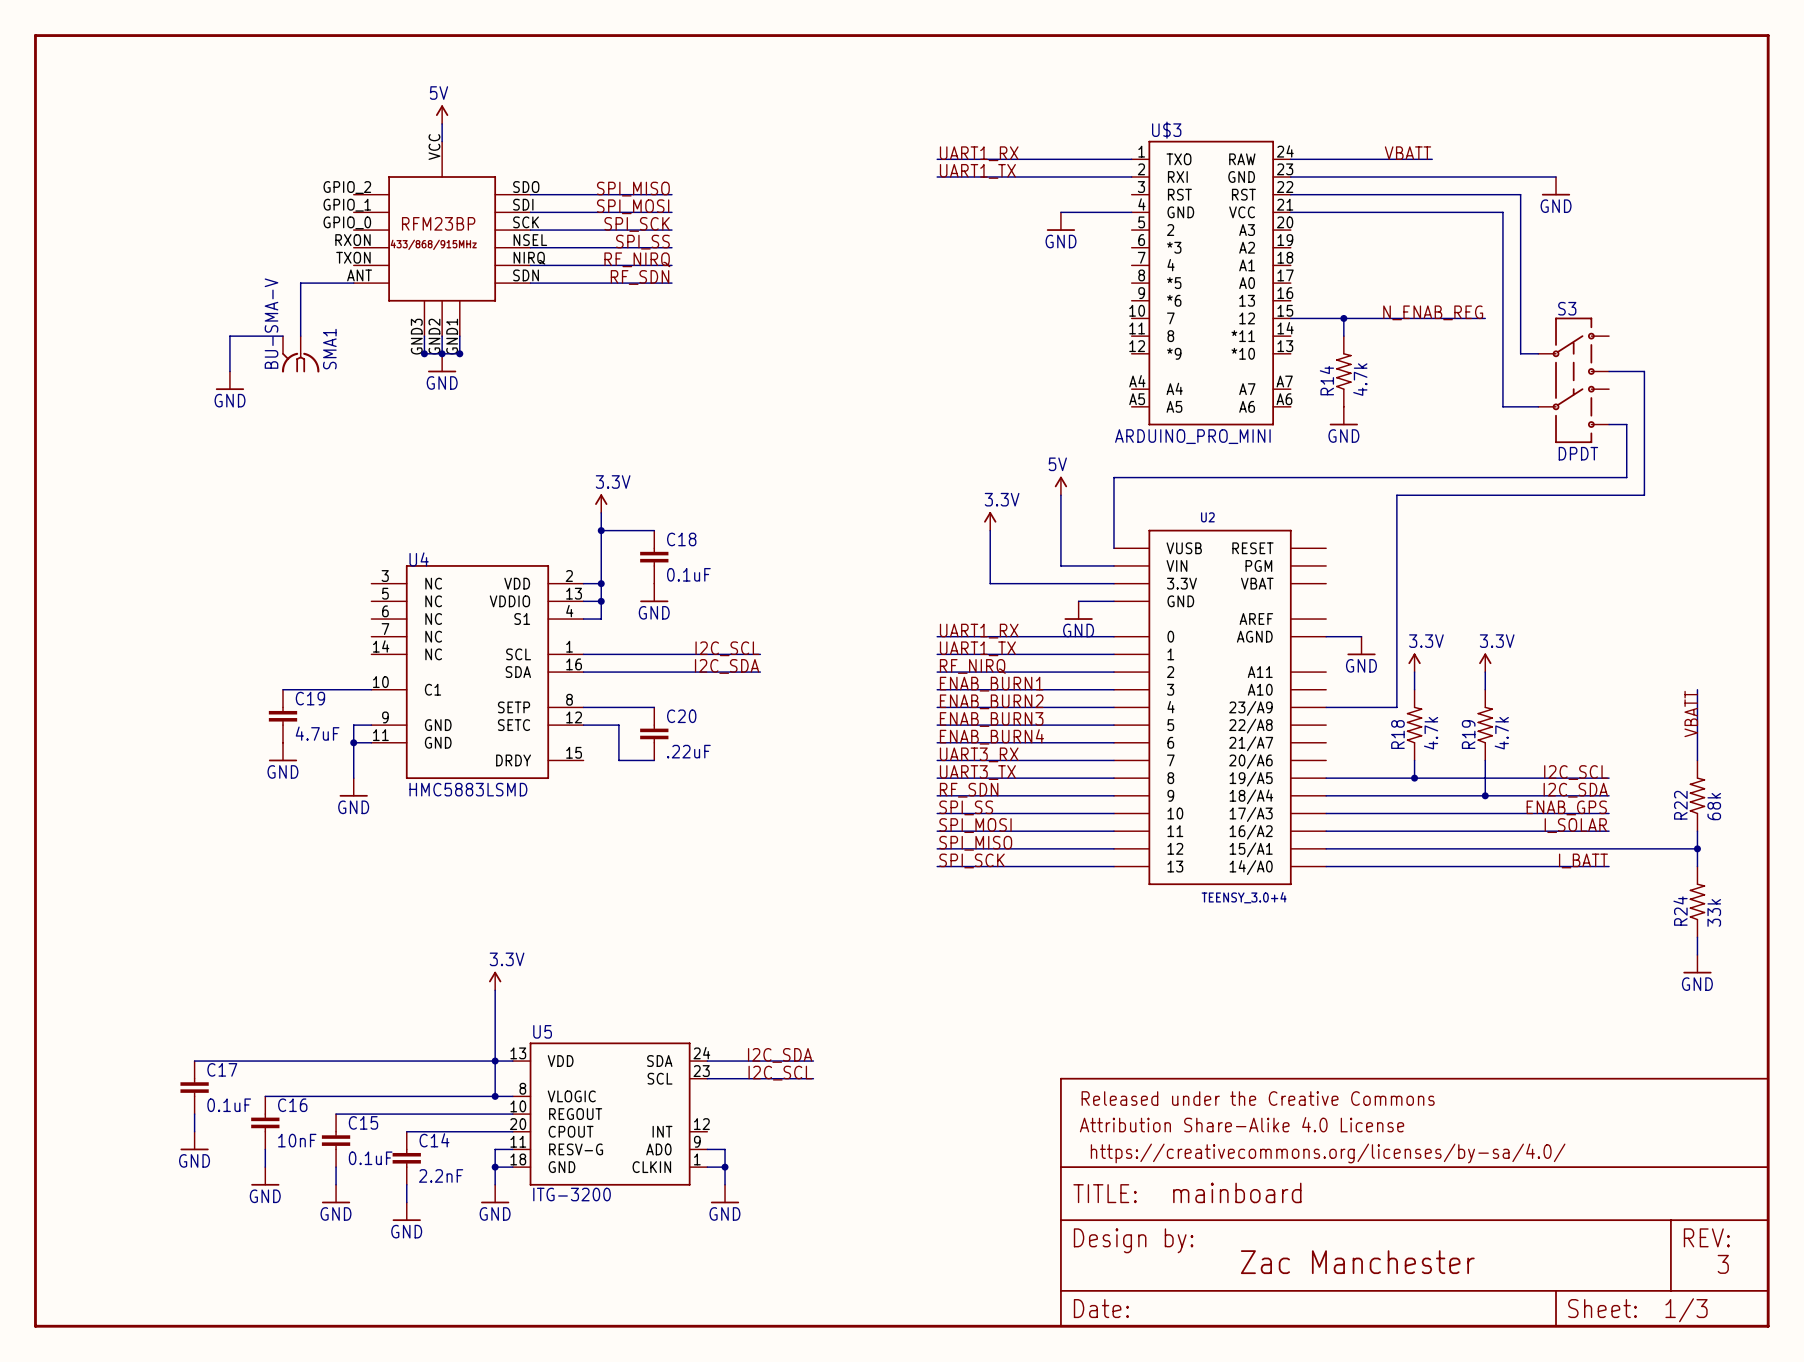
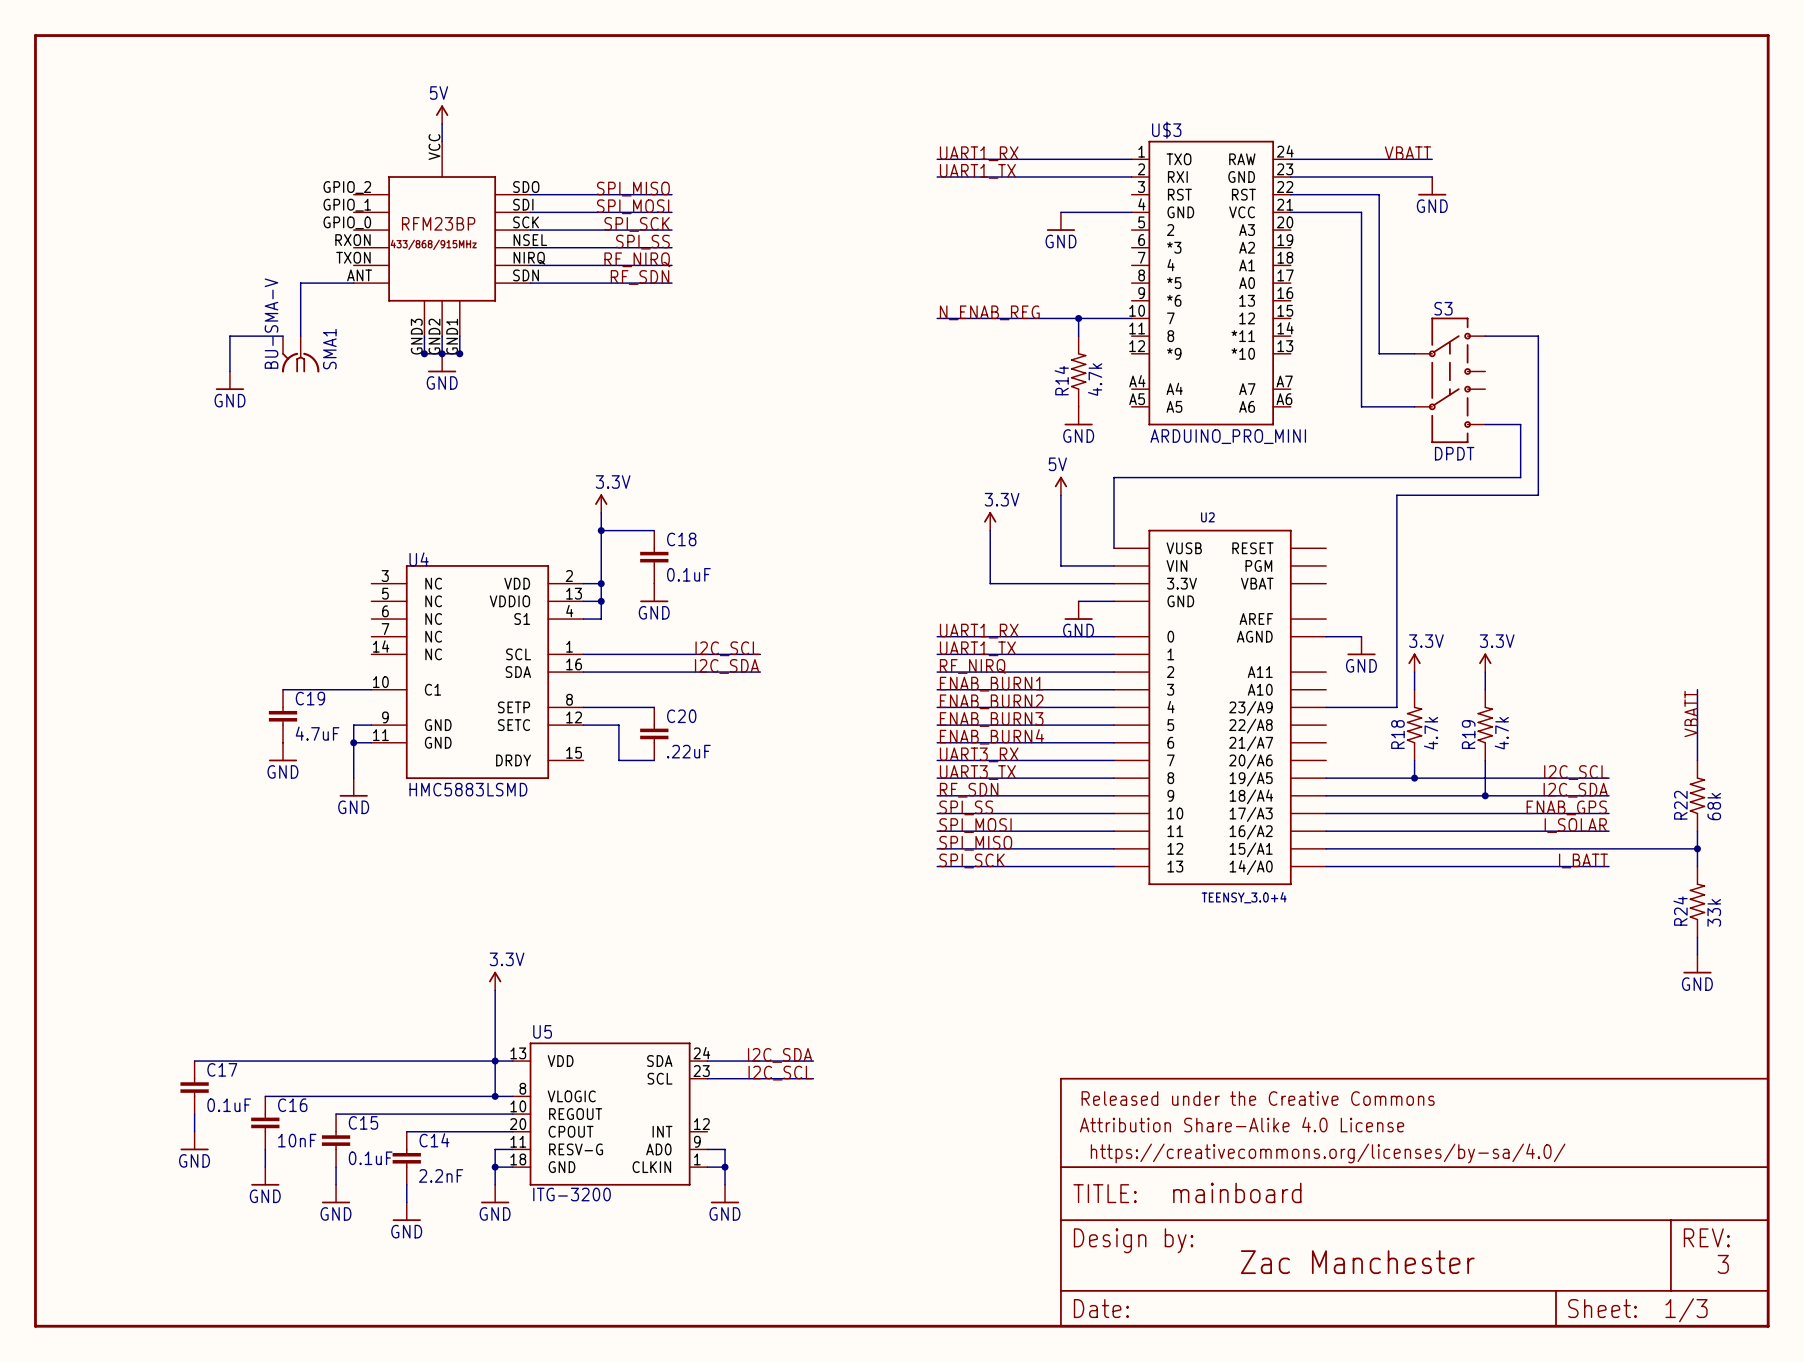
wire: (1432, 177) (1556, 177) -> none
power symbol: none -> GND (1432, 186)
power symbol: GND (1556, 186) -> none
wire: (1379, 194) (1520, 194) (1520, 353) (1538, 353) -> (1379, 194) (1379, 353) (1414, 353)
wire: (1361, 212) (1502, 212) (1502, 406) (1538, 406) -> (1361, 212) (1361, 406) (1414, 406)
label: none -> N_ENAB_REG (989, 312)
label: N_ENAB_REG (1433, 312) -> none
wire: none -> (937, 318) (1131, 318)
wire: none -> (1078, 318) (1078, 336)
junction: none -> (1078, 318)
wire: (1290, 318) (1485, 318) -> none
wire: (1343, 318) (1343, 336) -> none
junction: (1343, 318) -> none
R14 position: (1343, 371) -> (1078, 371)
wire: (1609, 371) (1644, 371) (1644, 495) (1538, 495) -> (1485, 336) (1538, 336) (1538, 495)
S3 position: (1573, 380) -> (1449, 380)
power symbol: none -> GND (1078, 416)
power symbol: GND (1343, 416) -> none
wire: (1609, 424) (1626, 424) (1626, 477) (1520, 477) -> (1485, 424) (1520, 424) (1520, 477)
U$3 value position: ARDUINO_PRO_MINI (1192, 436) -> ARDUINO_PRO_MINI (1228, 436)

